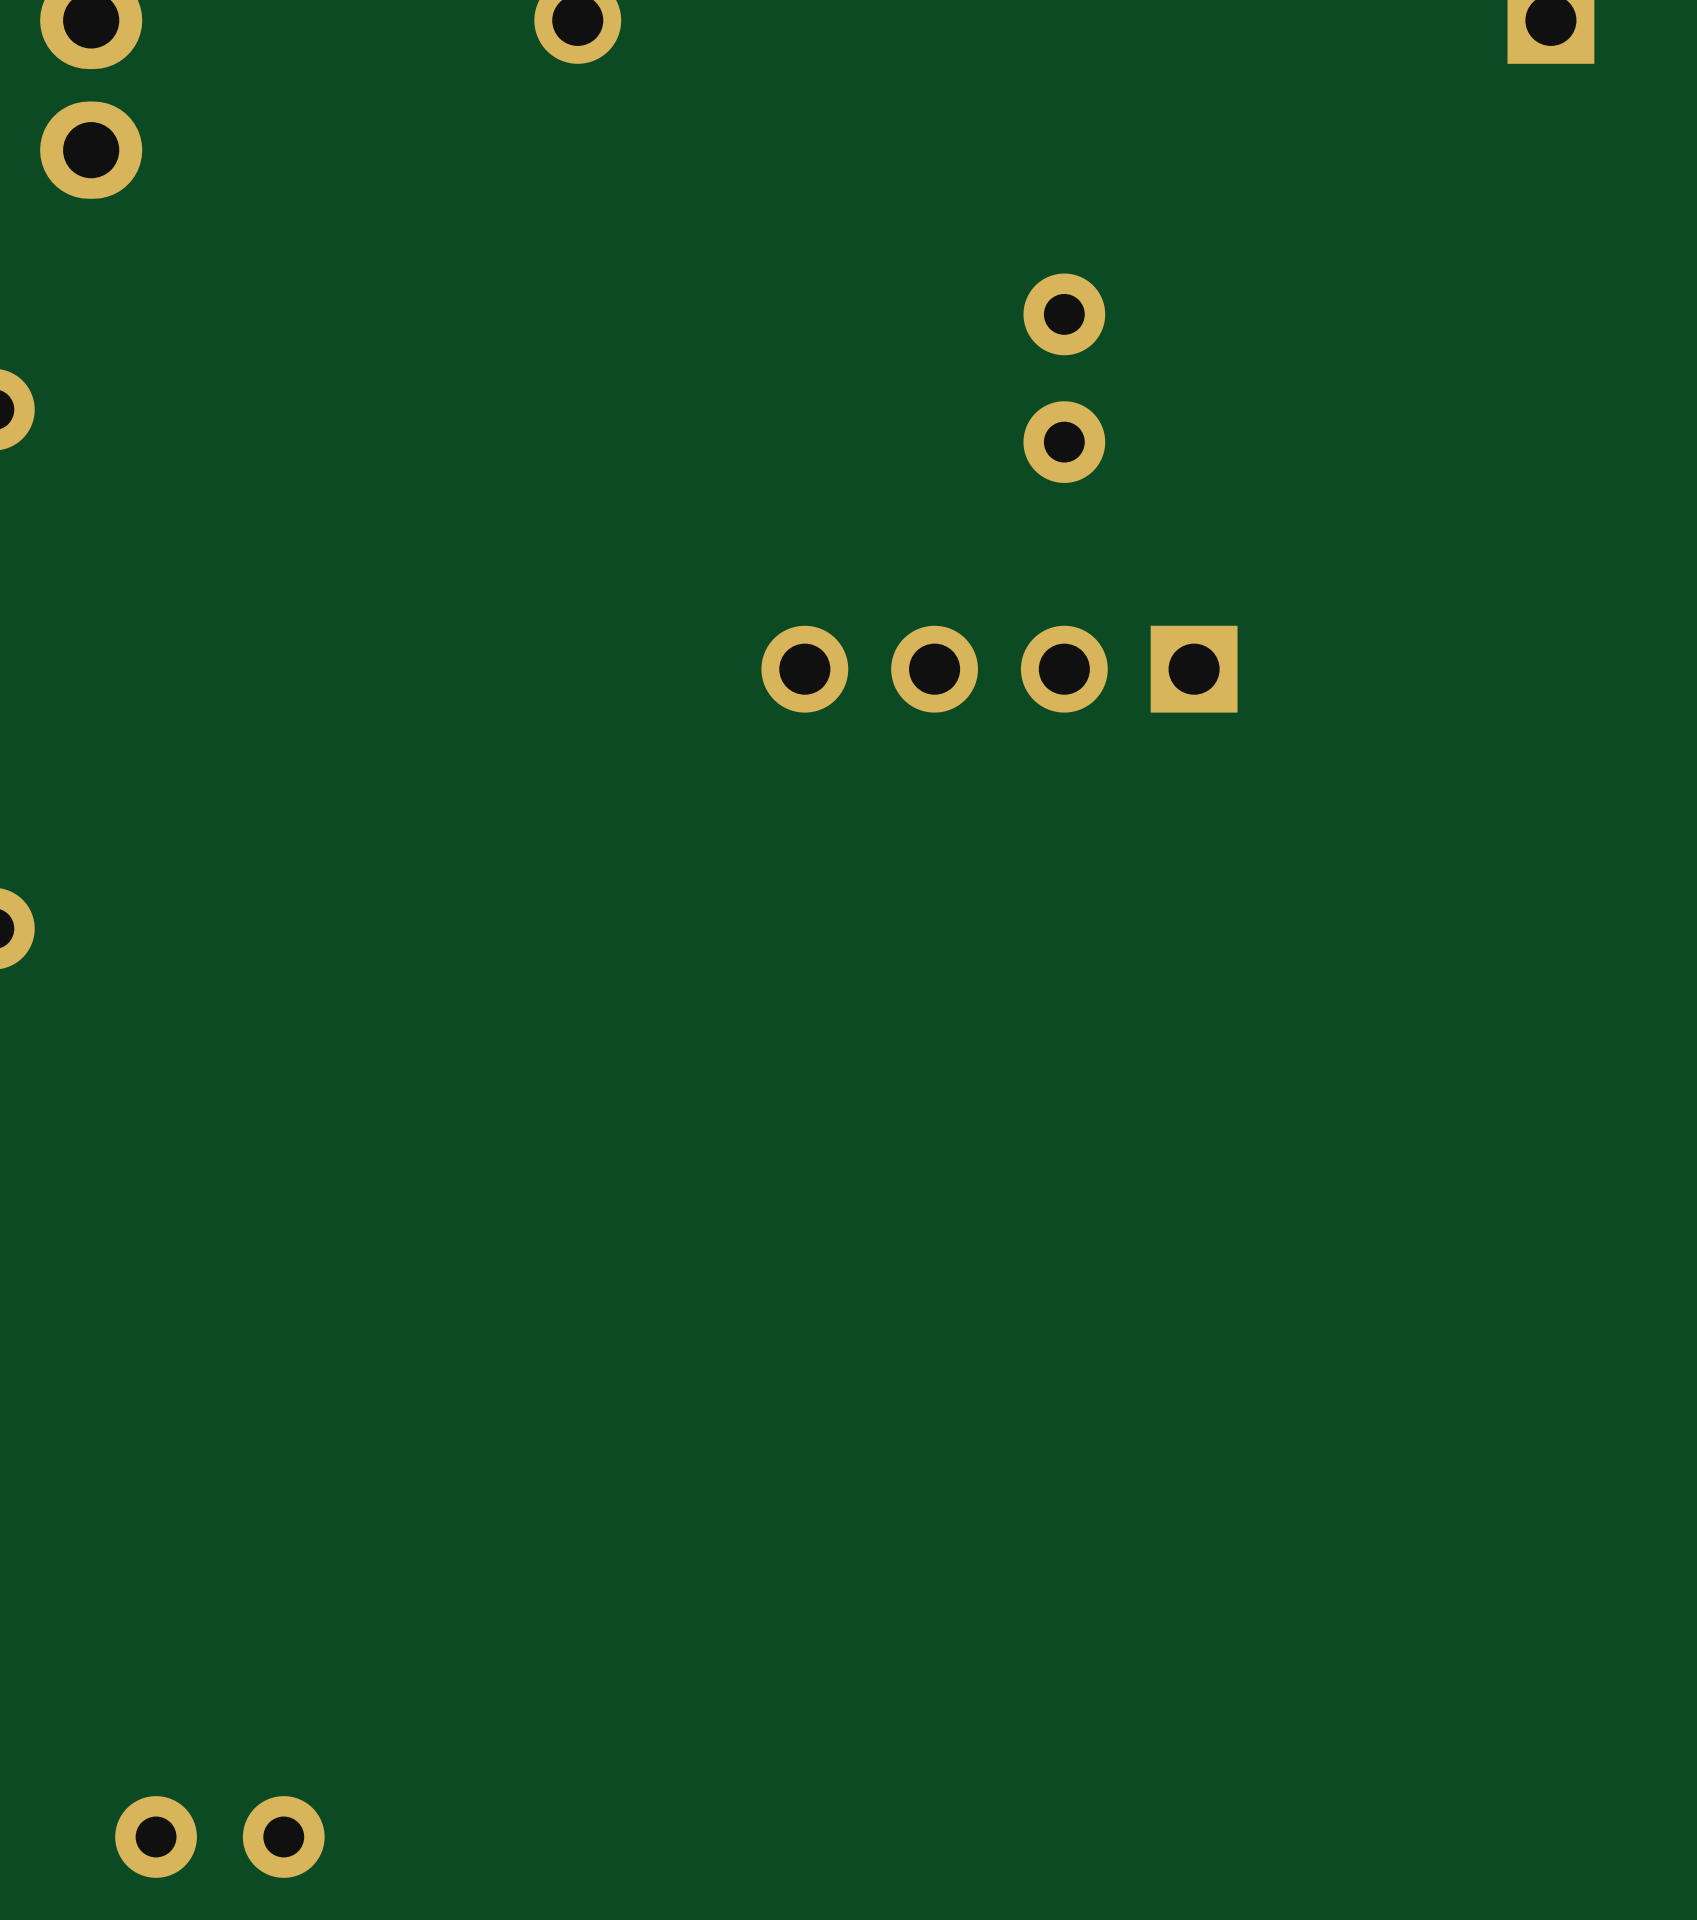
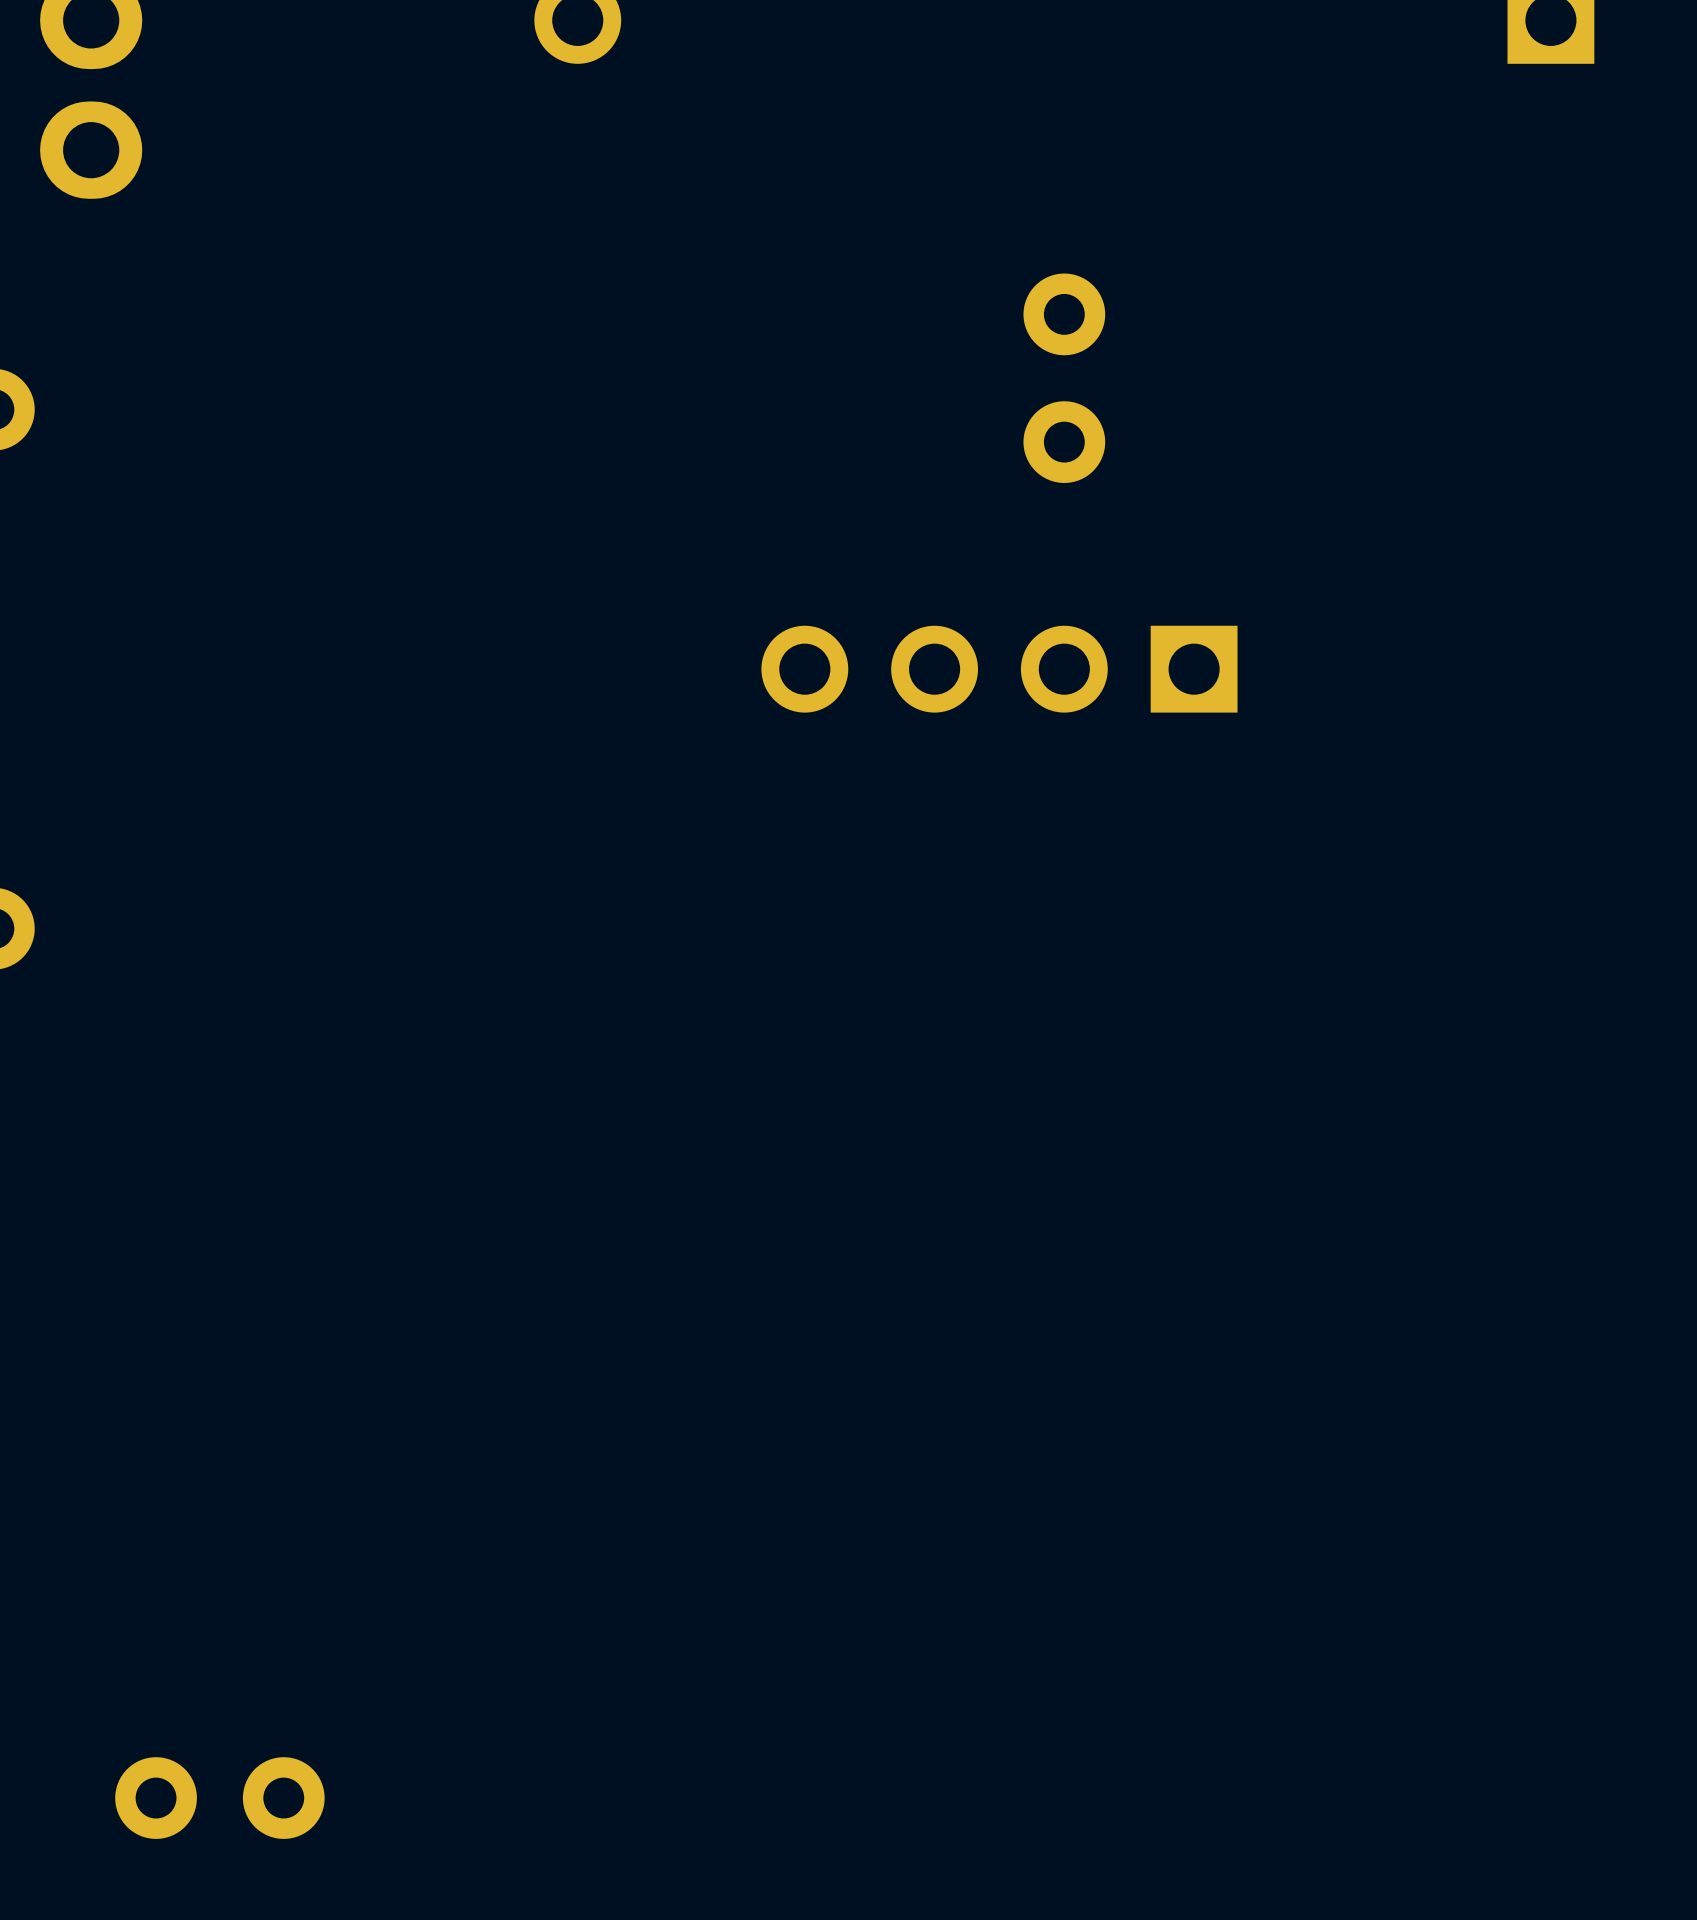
part position: (219, 1836) -> (219, 1798)

